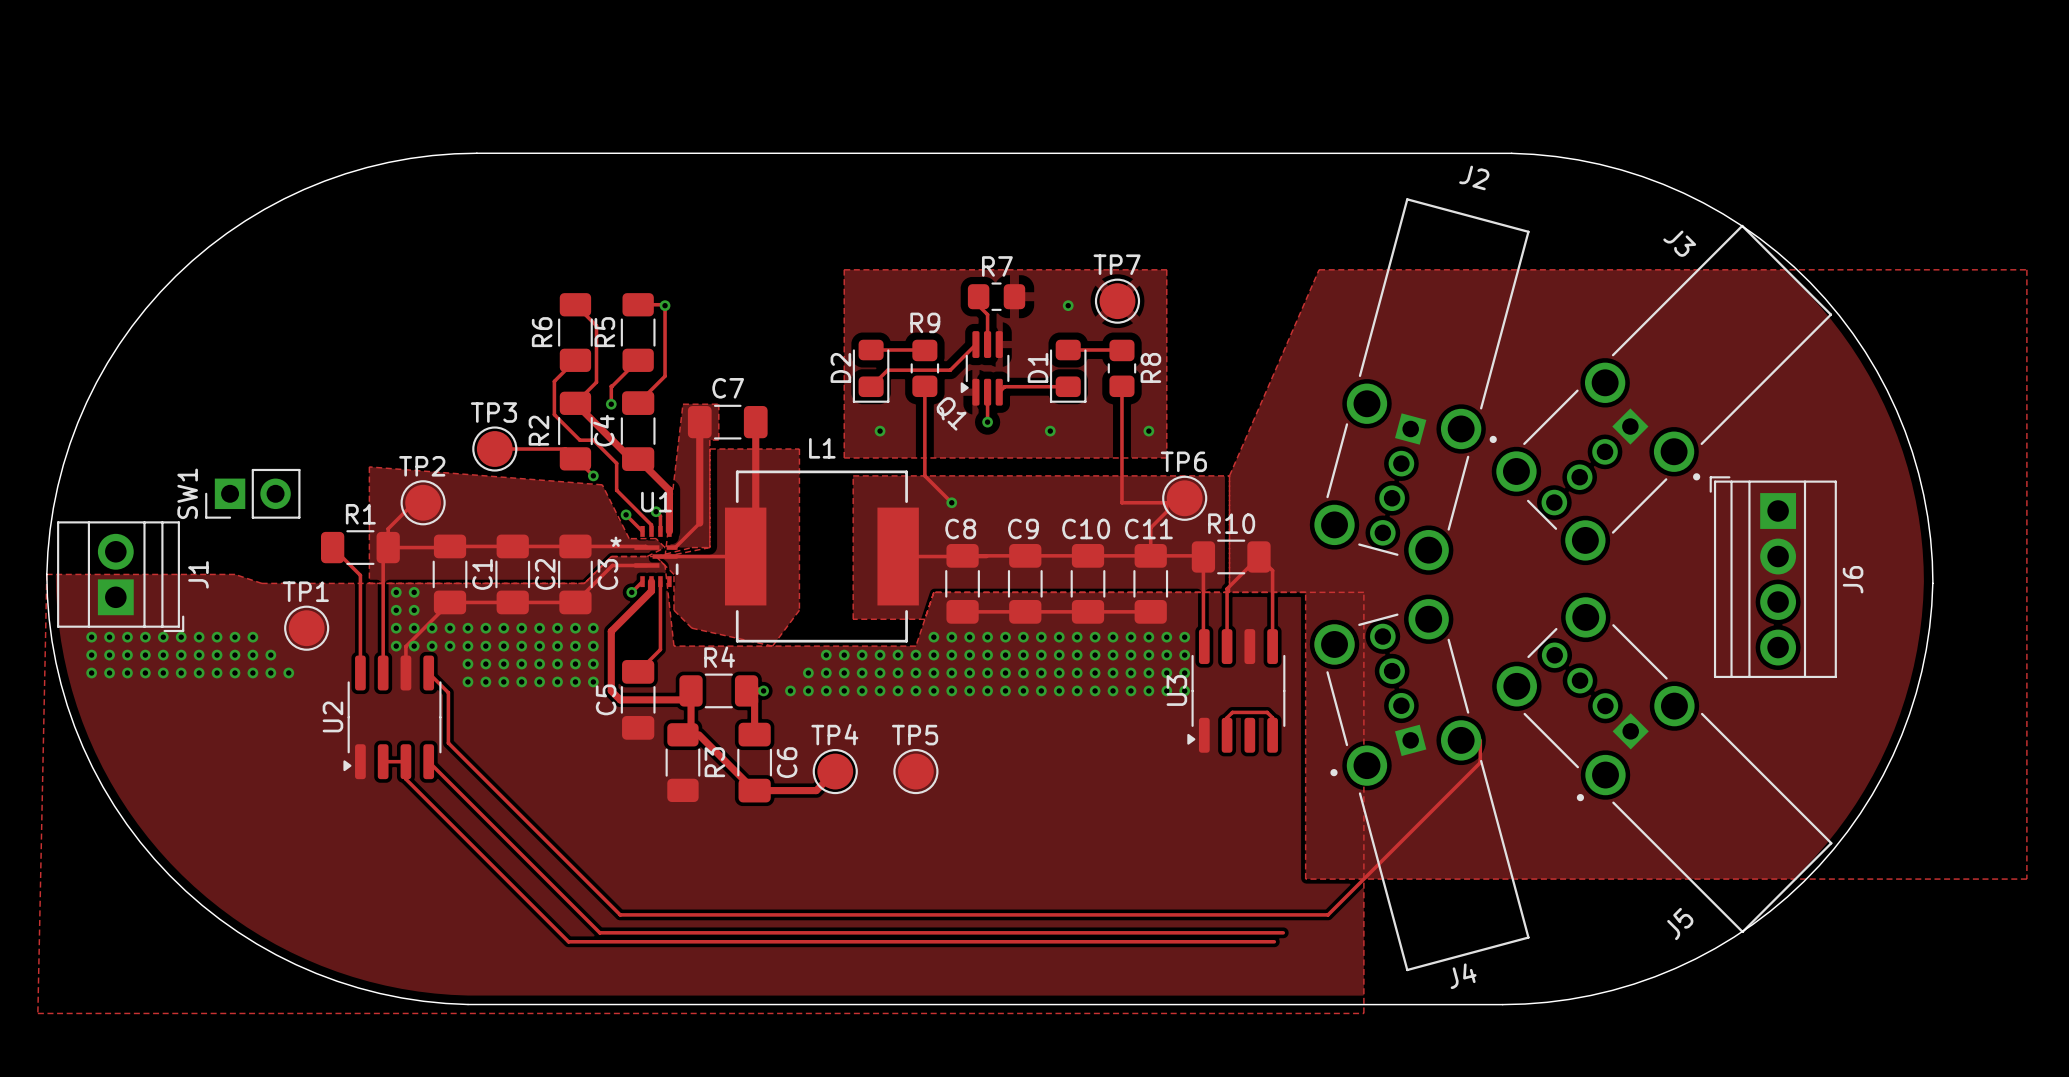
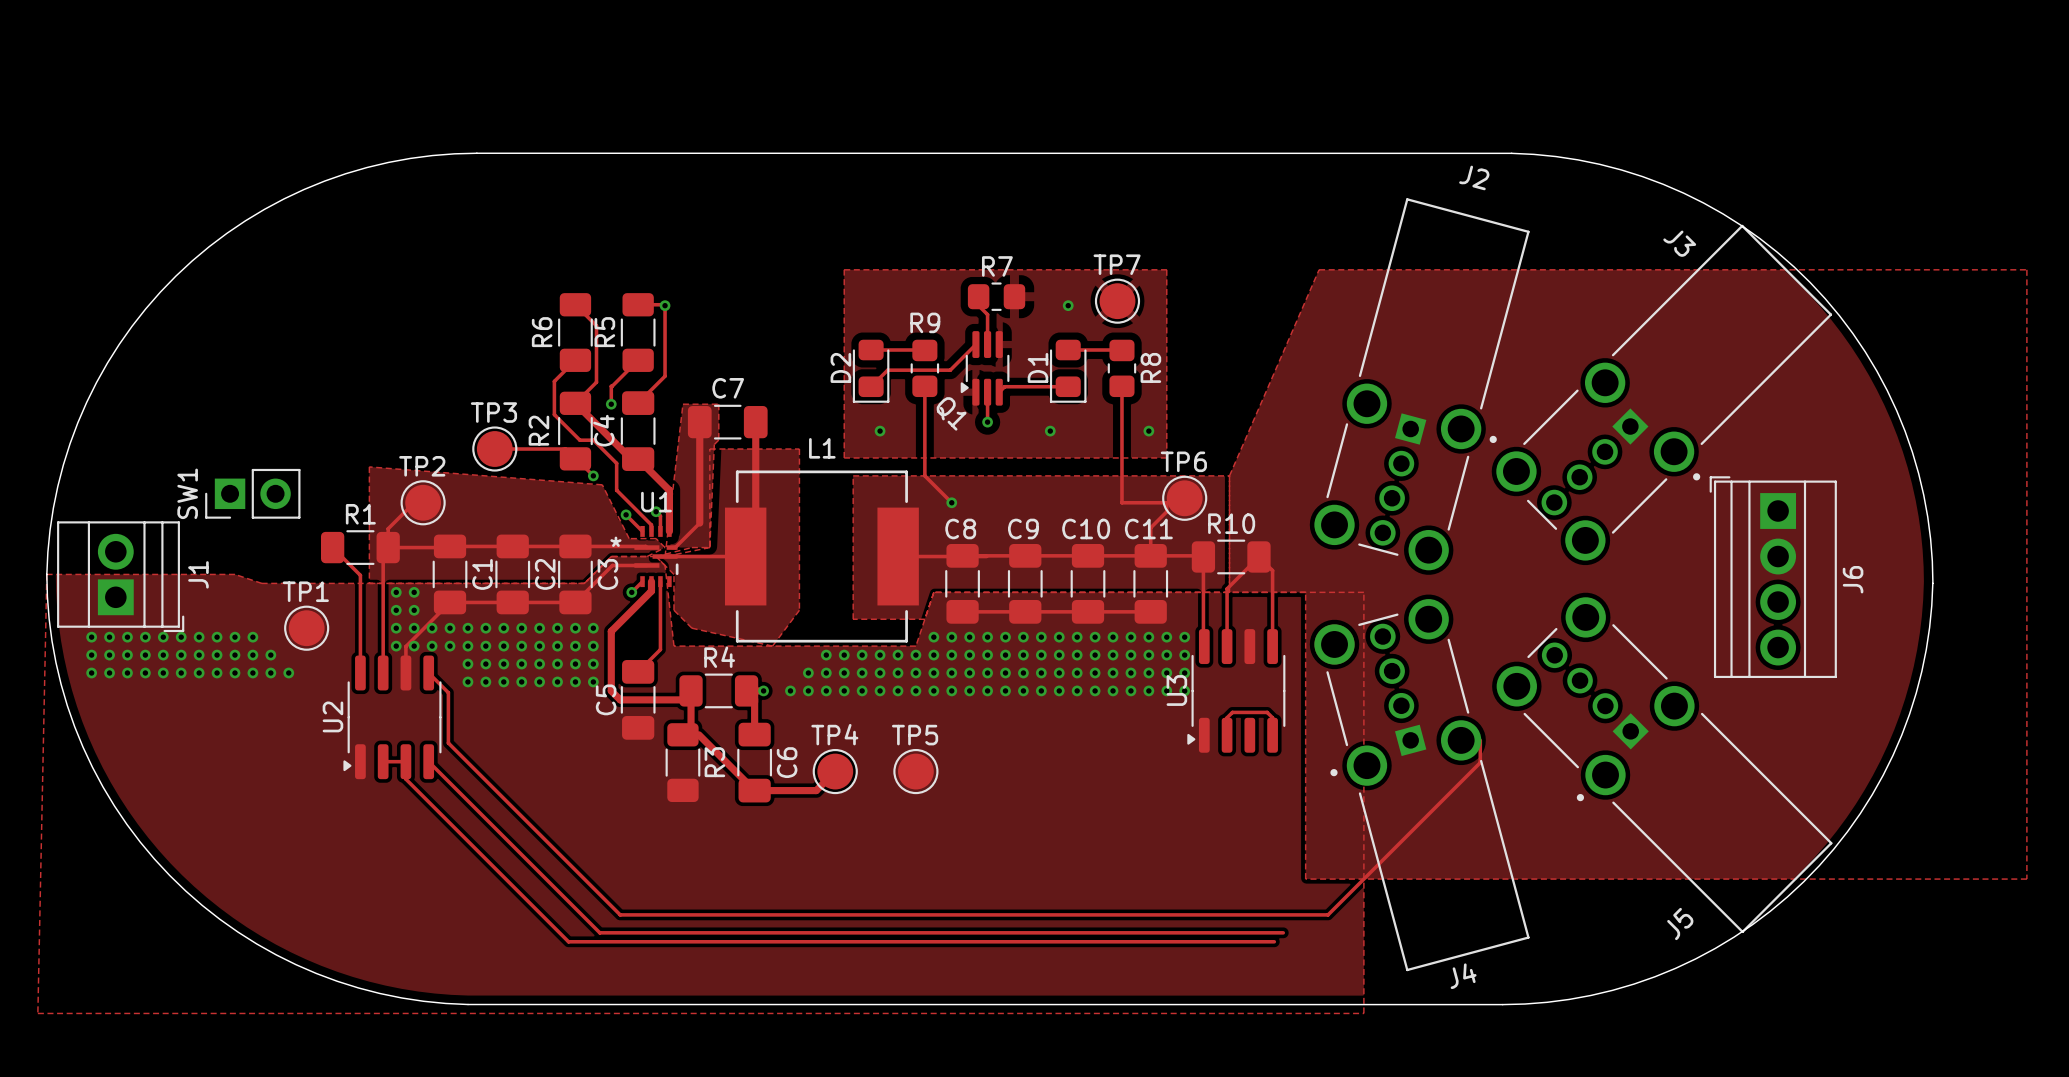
zone outline: (718, 440) (709, 440) (709, 449) -> (718, 440) (714, 444) (709, 547)

